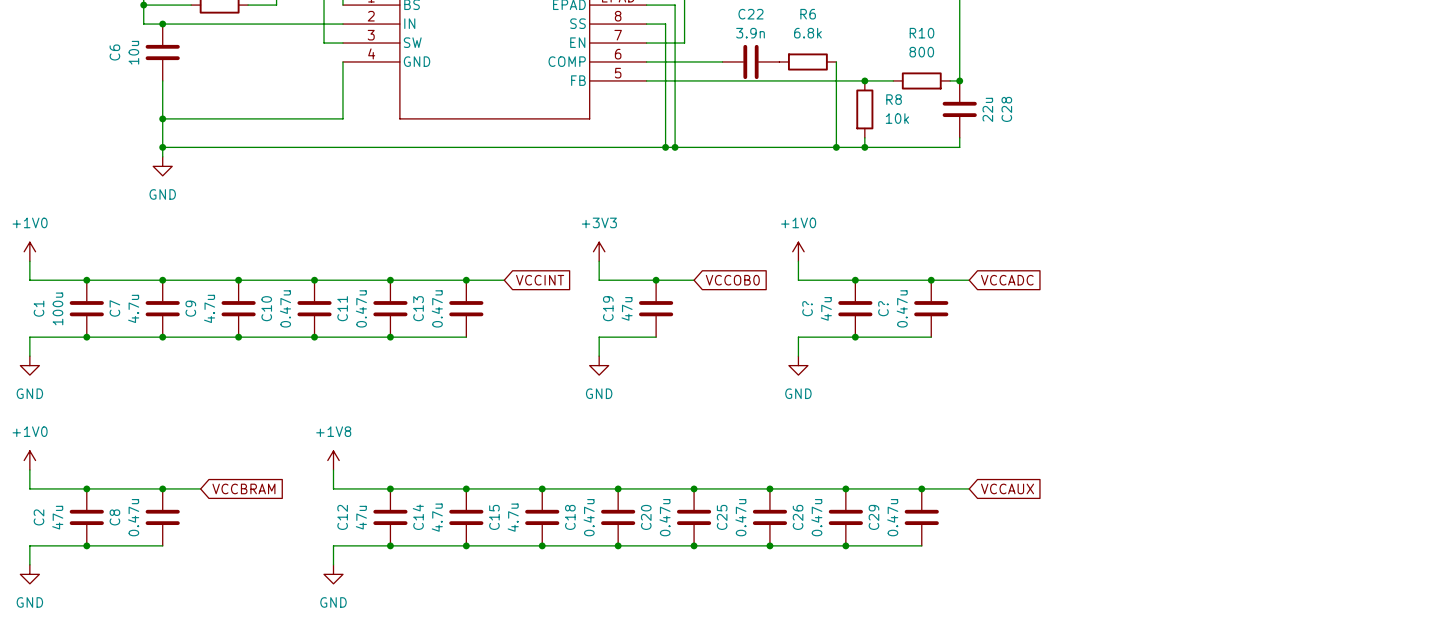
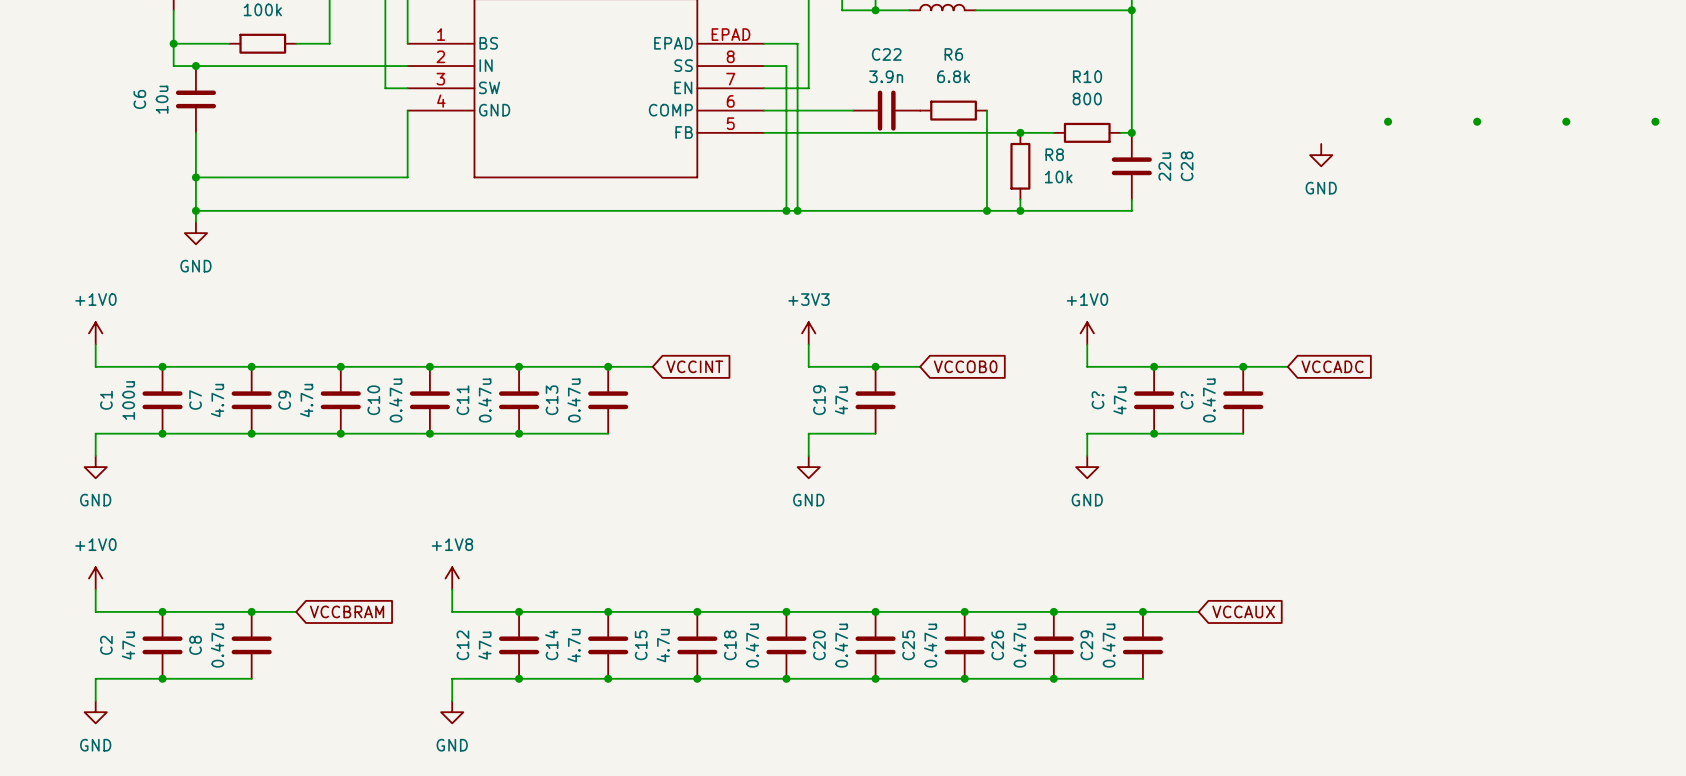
junction: none -> (1388, 121)
junction: none -> (1477, 121)
junction: none -> (1566, 121)
junction: none -> (1655, 121)
power symbol: none -> GND (1321, 155)
power symbol position: +1V0 (29, 251) -> +1V0 (95, 333)
power symbol position: +3V3 (599, 251) -> +3V3 (808, 333)
power symbol position: +1V0 (798, 251) -> +1V0 (1087, 333)
wire: (29, 261) (29, 280) (77, 280) -> (95, 344) (95, 366)
wire: (599, 261) (599, 280) (684, 280) -> (808, 344) (808, 366)
wire: (798, 261) (798, 280) (921, 280) -> (1087, 344) (1087, 366)
junction: (86, 280) -> none
junction: none -> (162, 366)
junction: (162, 280) -> none
junction: none -> (251, 366)
junction: (238, 280) -> none
junction: none -> (340, 366)
junction: (314, 280) -> none
junction: none -> (429, 366)
junction: (390, 280) -> none
junction: none -> (519, 366)
junction: (466, 280) -> none
wire: none -> (597, 366) (652, 366)
junction: none -> (608, 366)
global label position: VCCINT (540, 280) -> VCCINT (694, 366)
junction: (656, 280) -> none
wire: none -> (819, 366) (920, 366)
global label position: VCCOB0 (732, 280) -> VCCOB0 (965, 366)
junction: none -> (875, 366)
junction: (855, 280) -> none
junction: (931, 280) -> none
wire: none -> (1142, 366) (1287, 366)
junction: none -> (1154, 366)
global label position: VCCADC (1007, 280) -> VCCADC (1332, 366)
junction: none -> (1243, 366)
C1 position: (86, 308) -> (162, 400)
C7 position: (162, 308) -> (251, 400)
C9 position: (238, 308) -> (340, 400)
C10 position: (314, 308) -> (429, 400)
C11 position: (390, 308) -> (519, 400)
C13 position: (466, 308) -> (608, 400)
C19 position: (656, 308) -> (875, 400)
C? position: (855, 308) -> (1154, 400)
C? position: (931, 308) -> (1243, 400)
wire: (77, 337) (29, 337) (29, 356) -> (95, 433) (95, 455)
junction: (86, 337) -> none
junction: none -> (162, 433)
junction: (162, 337) -> none
junction: none -> (251, 433)
junction: (238, 337) -> none
junction: none -> (340, 433)
junction: (314, 337) -> none
junction: none -> (429, 433)
junction: (390, 337) -> none
junction: none -> (519, 433)
wire: none -> (552, 433) (608, 433)
wire: (656, 337) (599, 337) (599, 356) -> (875, 433) (808, 433) (808, 455)
junction: (855, 337) -> none
wire: (921, 337) (798, 337) (798, 356) -> (1087, 433) (1087, 455)
wire: none -> (1098, 433) (1243, 433)
junction: none -> (1154, 433)
power symbol position: GND (29, 365) -> GND (95, 467)
power symbol: GND (599, 365) -> none
power symbol: none -> GND (808, 467)
power symbol: GND (798, 365) -> none
power symbol: none -> GND (1087, 467)
power symbol position: +1V0 (29, 460) -> +1V0 (95, 578)
power symbol position: +1V8 (333, 460) -> +1V8 (452, 578)
wire: (29, 469) (29, 488) (77, 488) -> (95, 589) (95, 611)
wire: (333, 469) (333, 488) (380, 488) -> (452, 589) (452, 611)
junction: (86, 488) -> none
junction: none -> (162, 611)
junction: (162, 488) -> none
wire: none -> (240, 611) (296, 611)
junction: none -> (251, 611)
global label position: VCCBRAM (243, 488) -> VCCBRAM (347, 611)
junction: (390, 488) -> none
junction: none -> (519, 611)
junction: (466, 488) -> none
junction: none -> (608, 611)
junction: (542, 488) -> none
junction: none -> (697, 611)
junction: (618, 488) -> none
junction: none -> (786, 611)
junction: (694, 488) -> none
junction: none -> (875, 611)
junction: (769, 488) -> none
junction: none -> (964, 611)
junction: (845, 488) -> none
junction: none -> (1053, 611)
junction: (921, 488) -> none
wire: none -> (1142, 611) (1198, 611)
junction: none -> (1142, 611)
global label position: VCCAUX (1007, 488) -> VCCAUX (1243, 611)
C2 position: (86, 517) -> (162, 645)
C8 position: (162, 517) -> (251, 645)
C12 position: (390, 517) -> (519, 645)
C14 position: (466, 517) -> (608, 645)
C15 position: (542, 517) -> (697, 645)
C18 position: (618, 517) -> (786, 645)
C20 position: (694, 517) -> (875, 645)
C25 position: (769, 517) -> (964, 645)
C26 position: (845, 517) -> (1053, 645)
C29 position: (921, 517) -> (1142, 645)
wire: (77, 545) (29, 545) (29, 564) -> (95, 678) (95, 701)
junction: (86, 545) -> none
junction: none -> (162, 678)
wire: none -> (195, 678) (251, 678)
wire: (380, 545) (333, 545) (333, 564) -> (452, 678) (452, 701)
junction: (390, 545) -> none
junction: none -> (519, 678)
junction: (466, 545) -> none
junction: none -> (608, 678)
junction: (542, 545) -> none
junction: none -> (697, 678)
junction: (618, 545) -> none
junction: none -> (786, 678)
junction: (694, 545) -> none
junction: none -> (875, 678)
junction: (769, 545) -> none
junction: none -> (964, 678)
junction: (845, 545) -> none
junction: none -> (1053, 678)
wire: none -> (1087, 678) (1142, 678)
power symbol position: GND (29, 574) -> GND (95, 712)
power symbol position: GND (333, 574) -> GND (452, 712)

